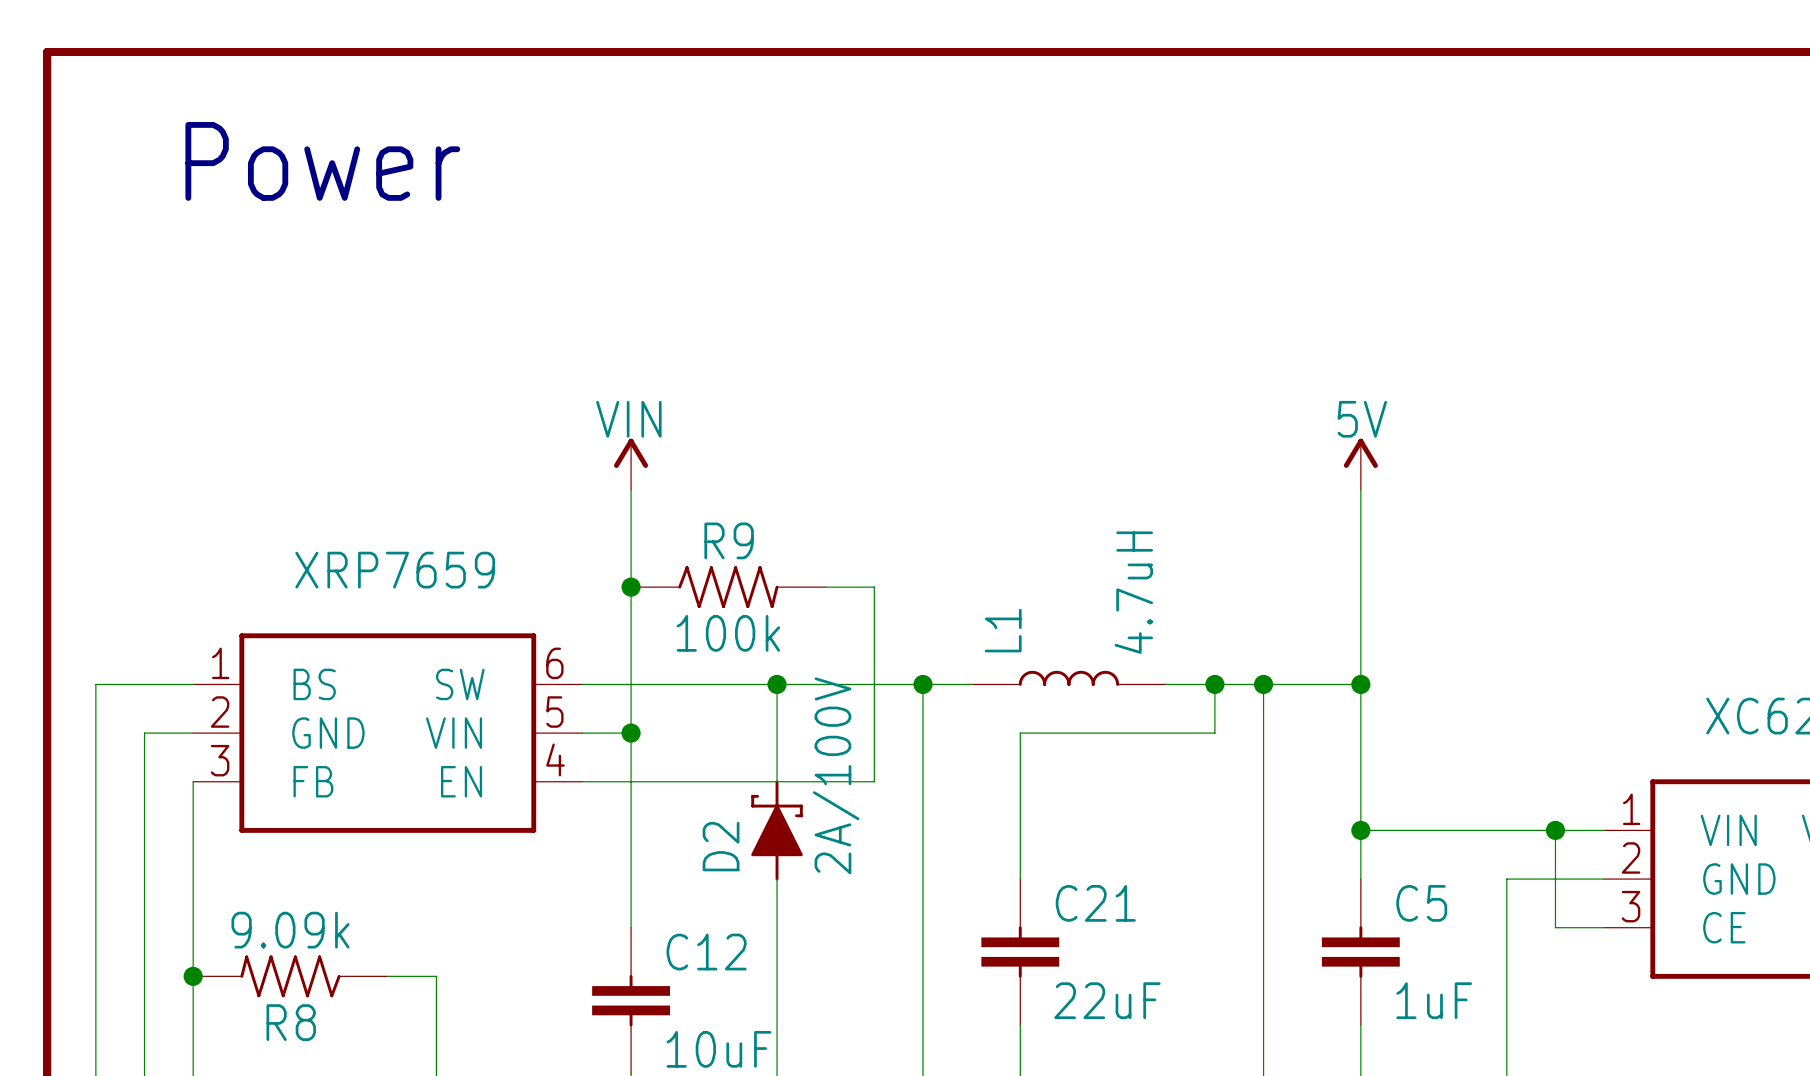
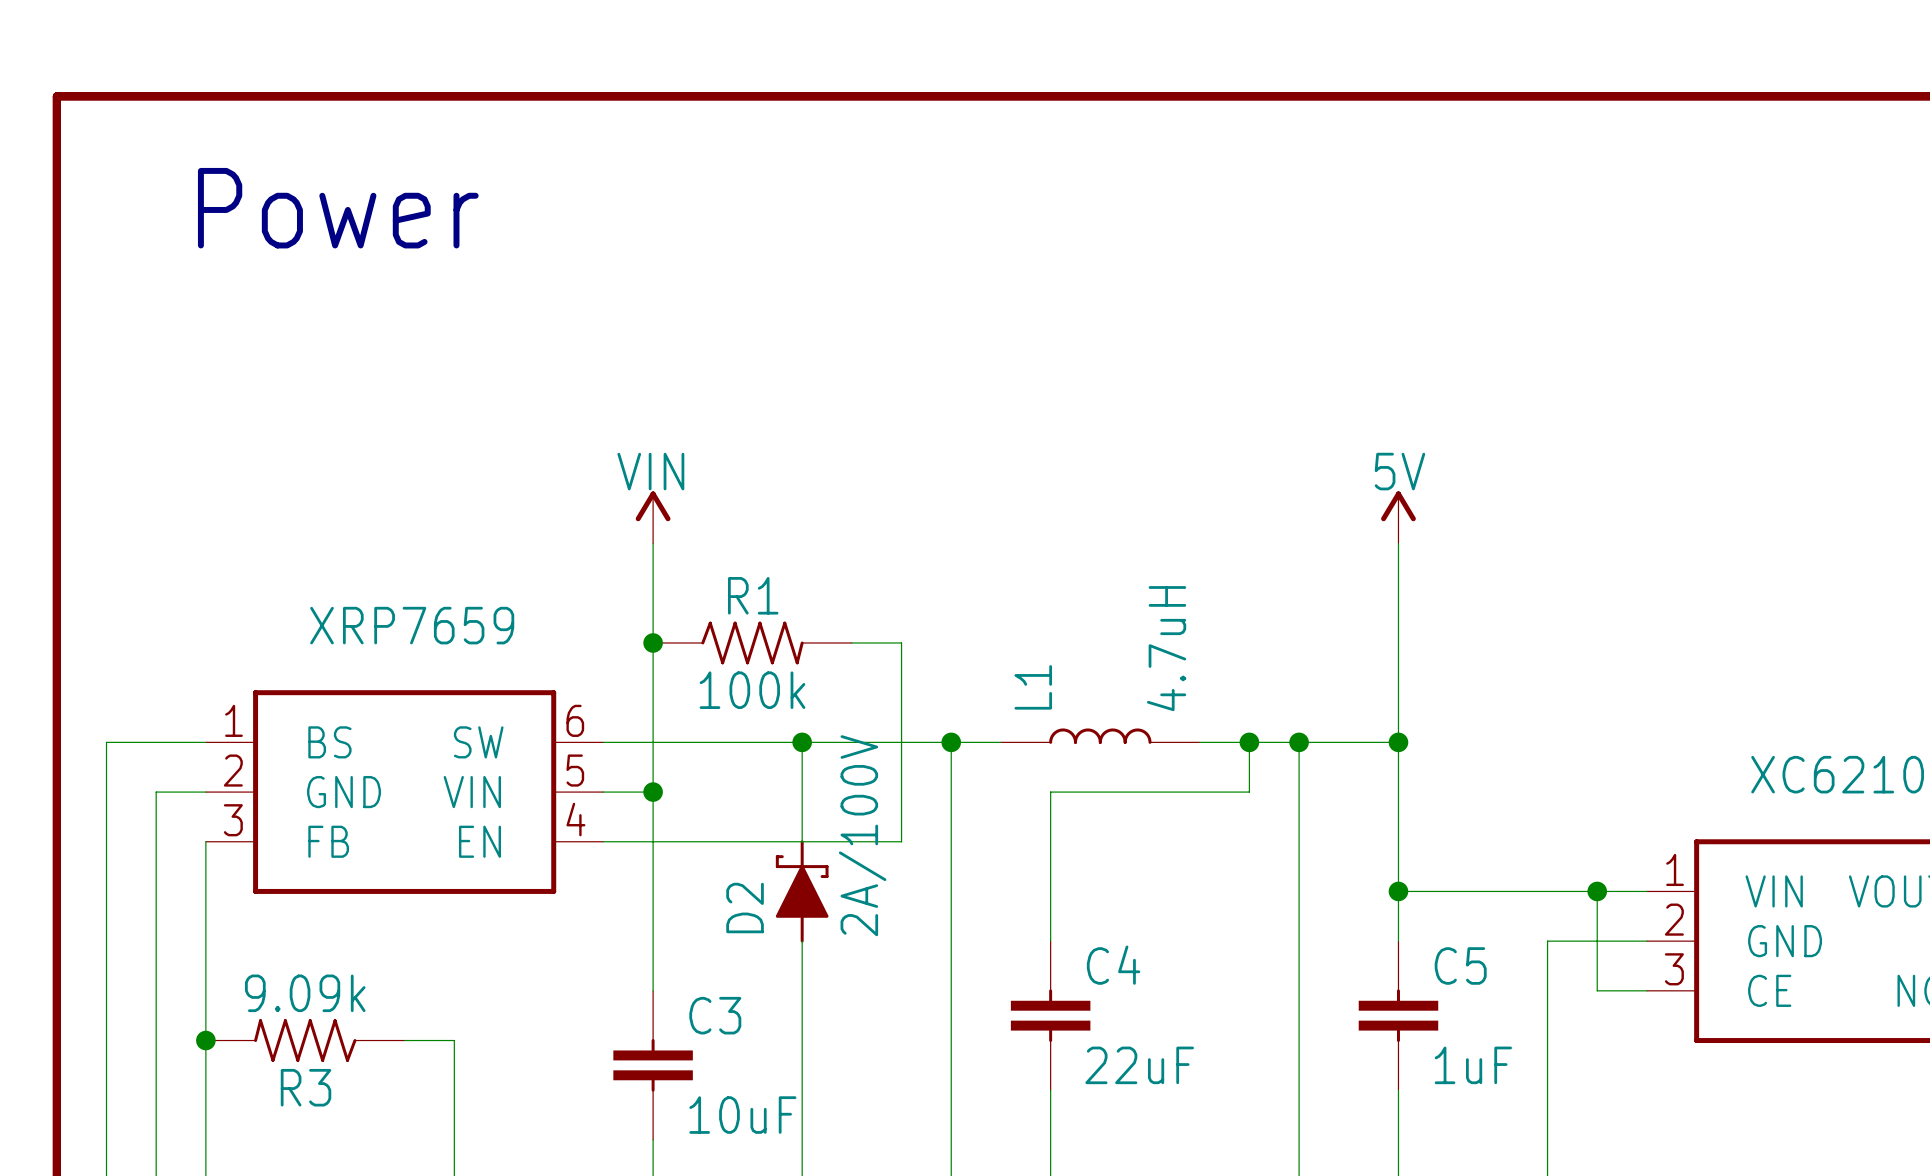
R9 name: R9 (729, 540) -> R1 (753, 595)
C21 name: C21 (1095, 903) -> C4 (1113, 965)
C12 name: C12 (706, 952) -> C3 (715, 1015)
R8 name: R8 (291, 1022) -> R3 (306, 1087)

